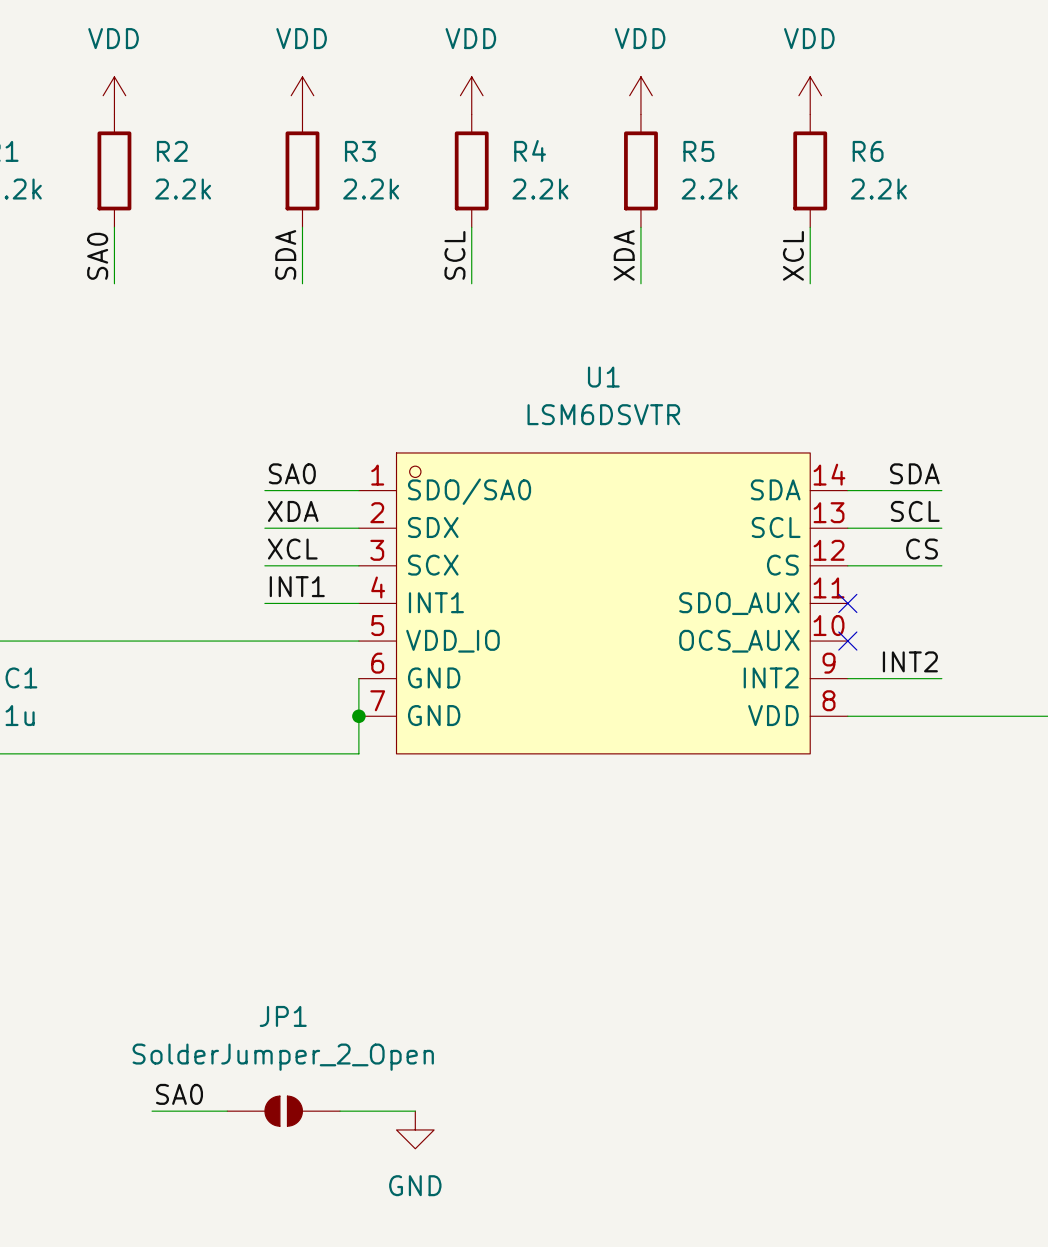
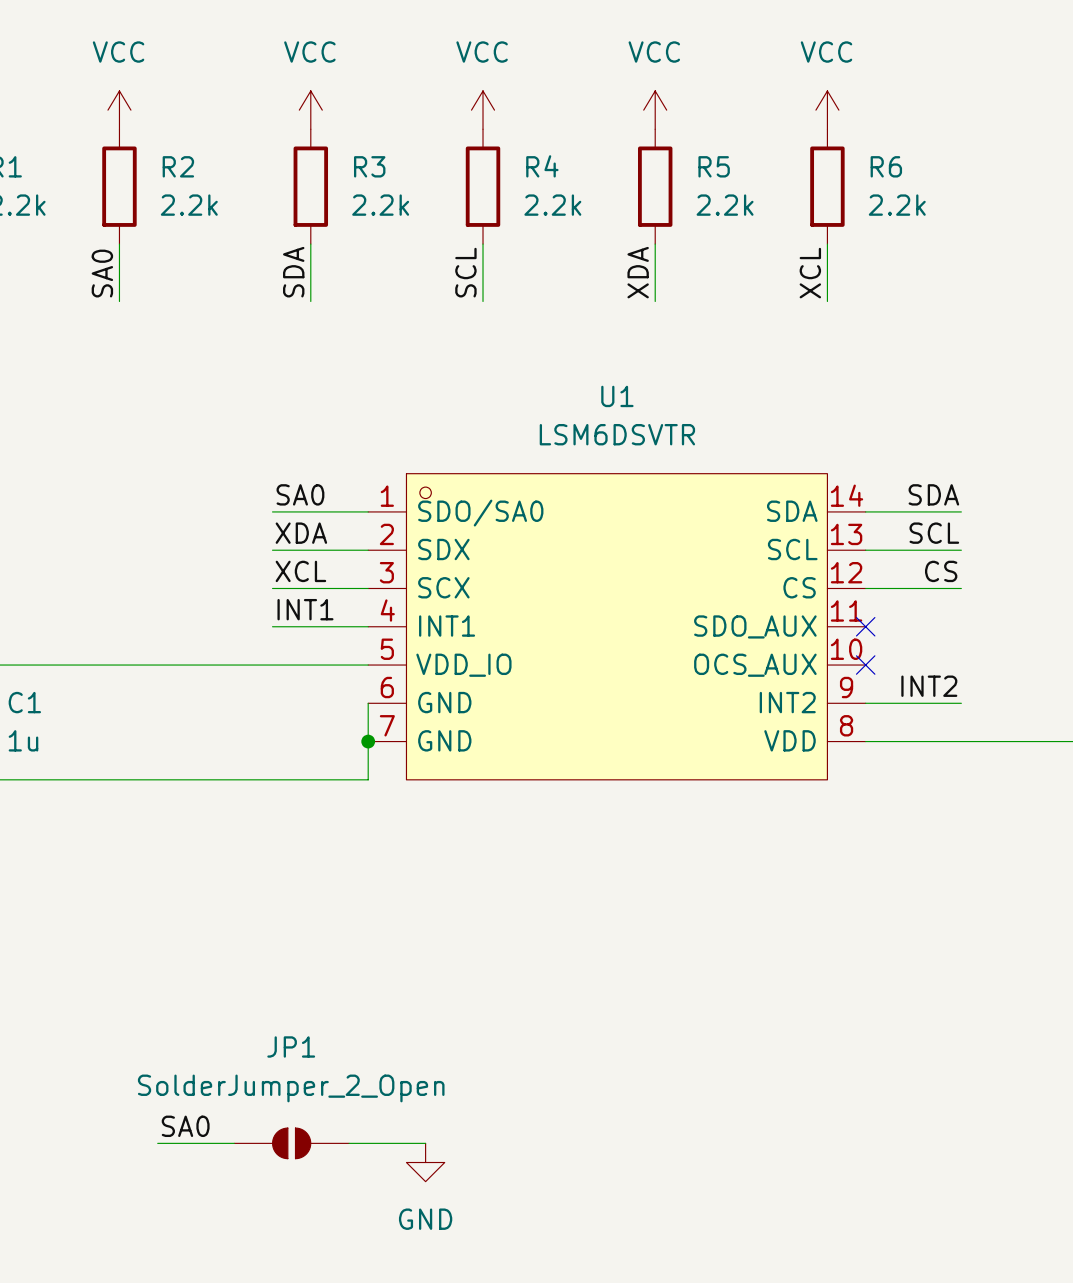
power symbol: VDD (114, 95) -> VCC (119, 110)
power symbol: VDD (302, 95) -> VCC (310, 110)
power symbol: VDD (471, 95) -> VCC (483, 110)
power symbol: VDD (640, 95) -> VCC (655, 110)
power symbol: VDD (810, 95) -> VCC (827, 110)

